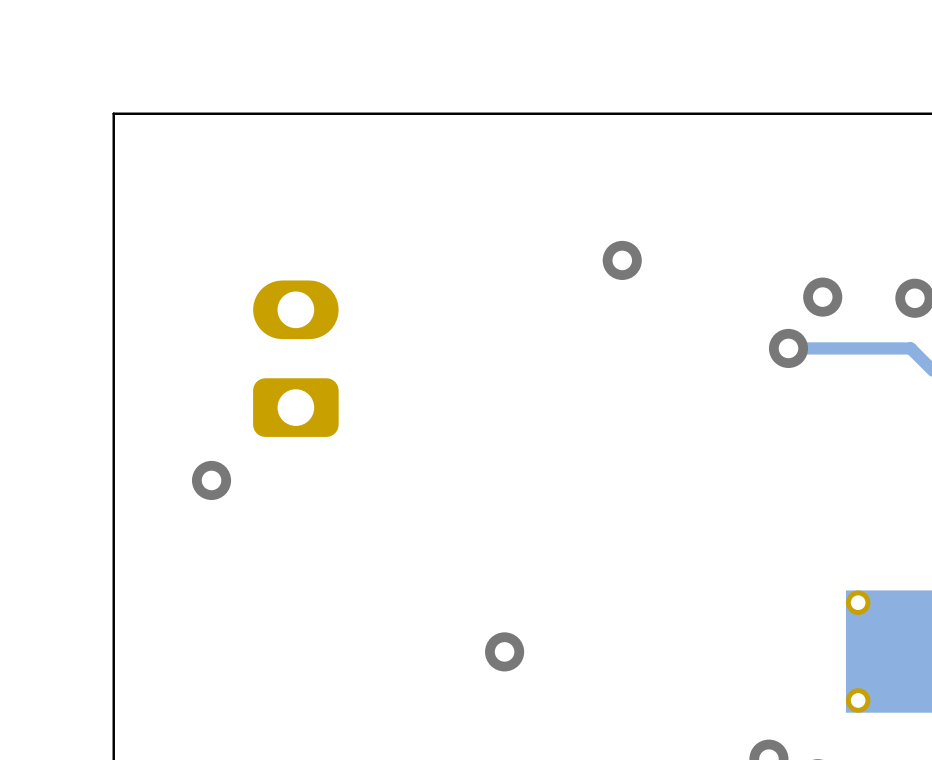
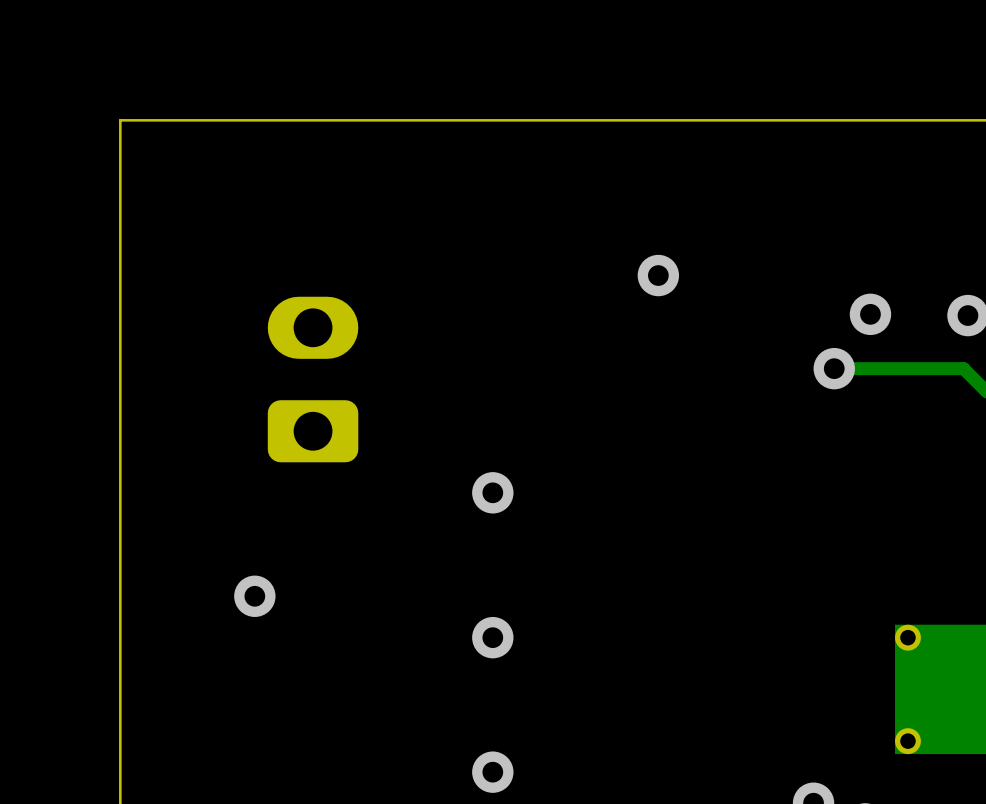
via: none -> (492, 492)
via position: (211, 480) -> (254, 596)
via: none -> (492, 637)
via: (504, 651) -> none
via: none -> (492, 772)

